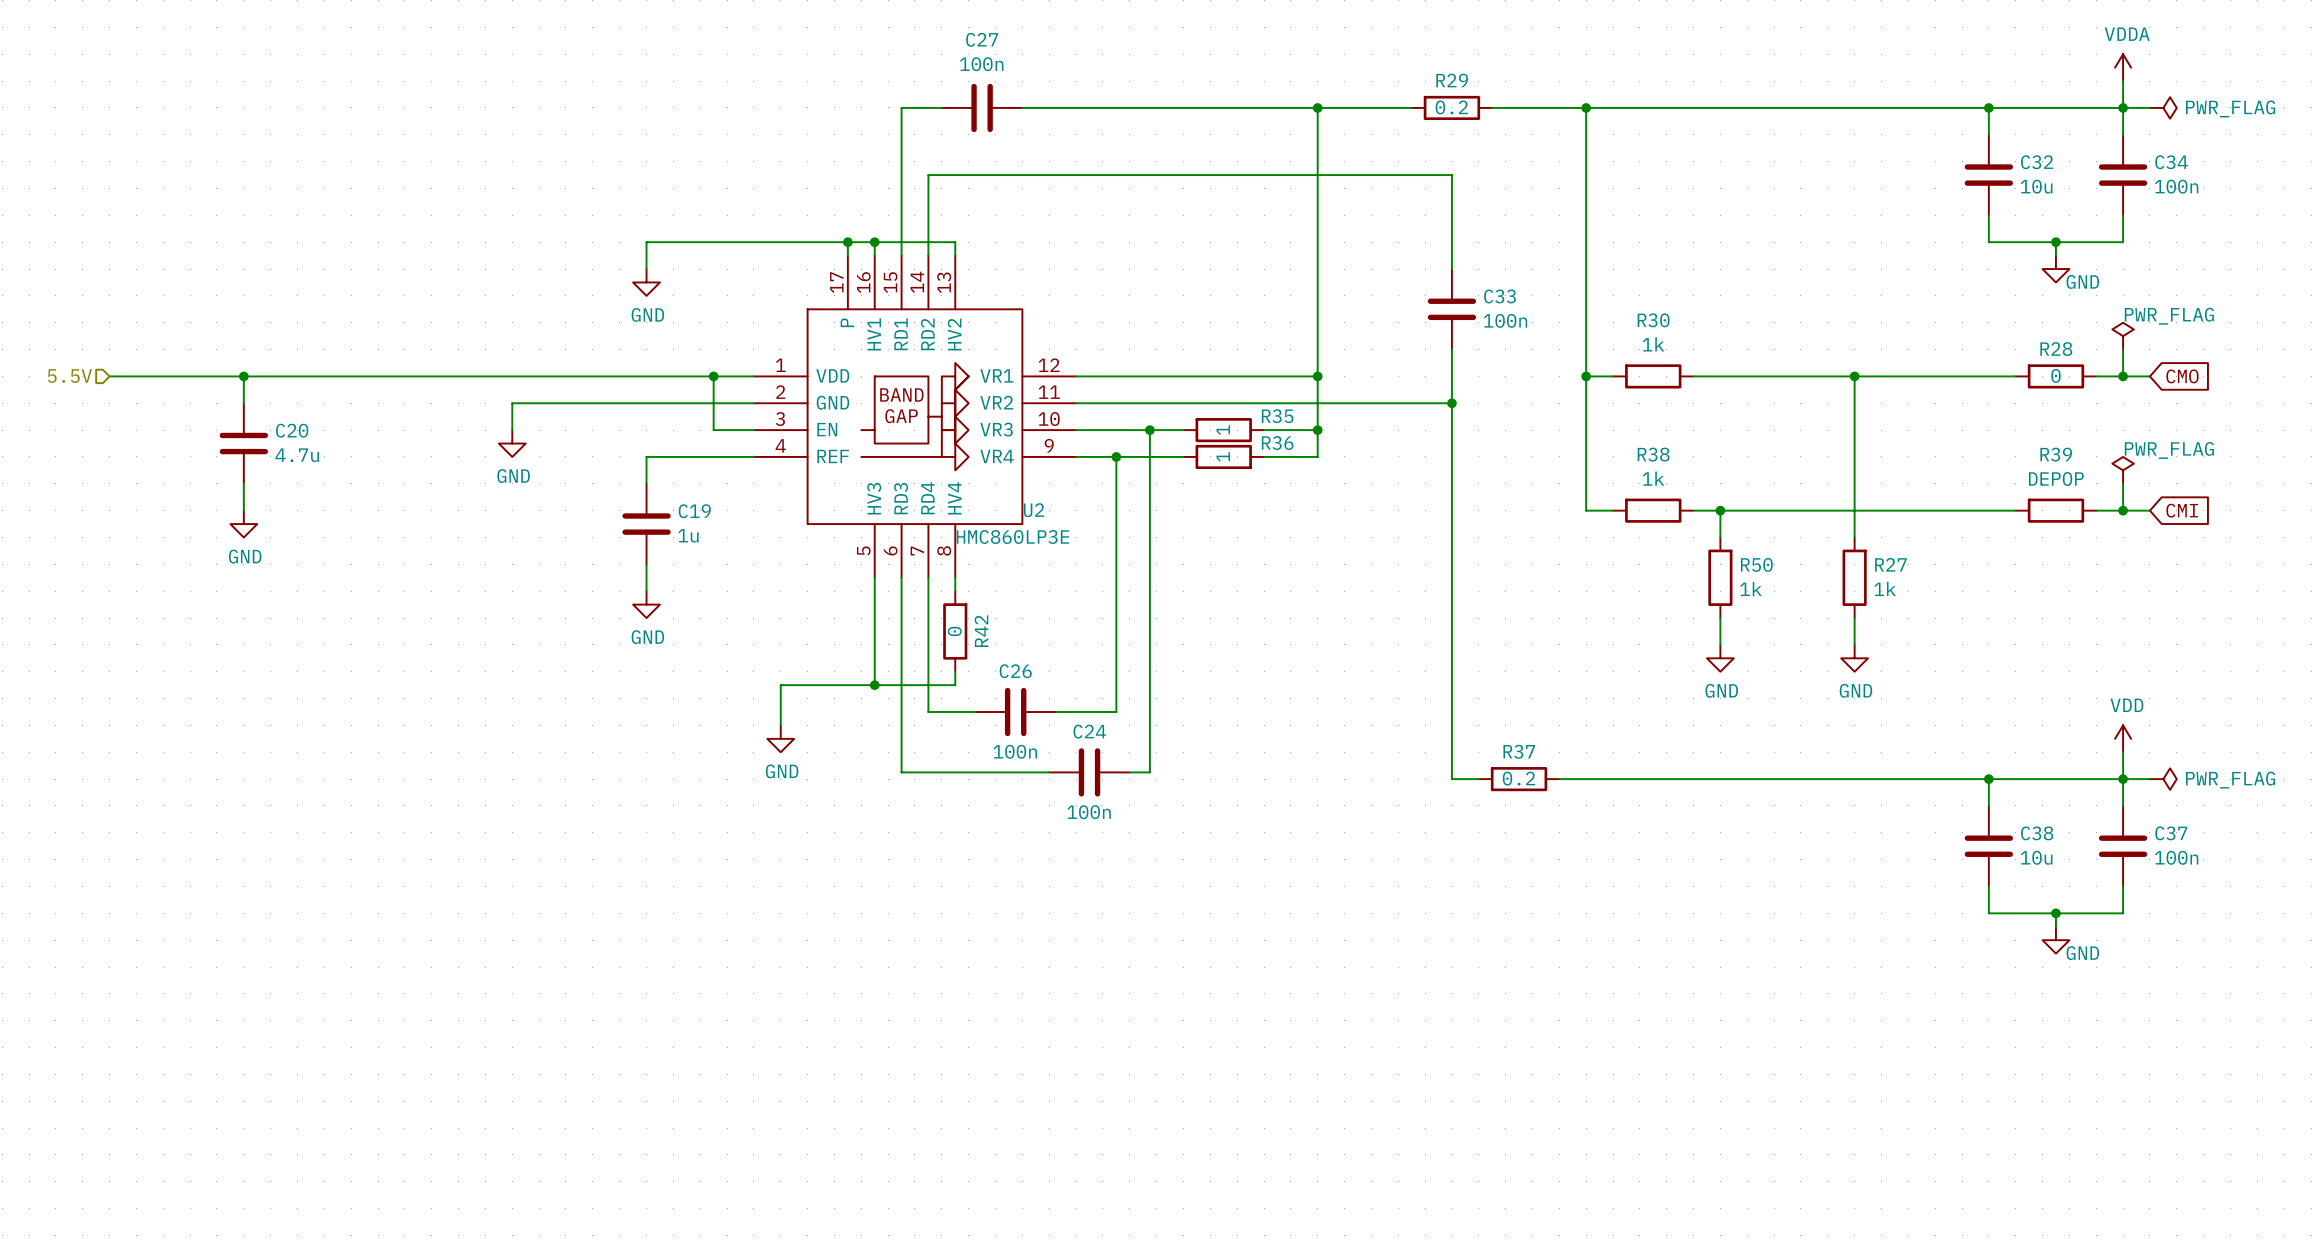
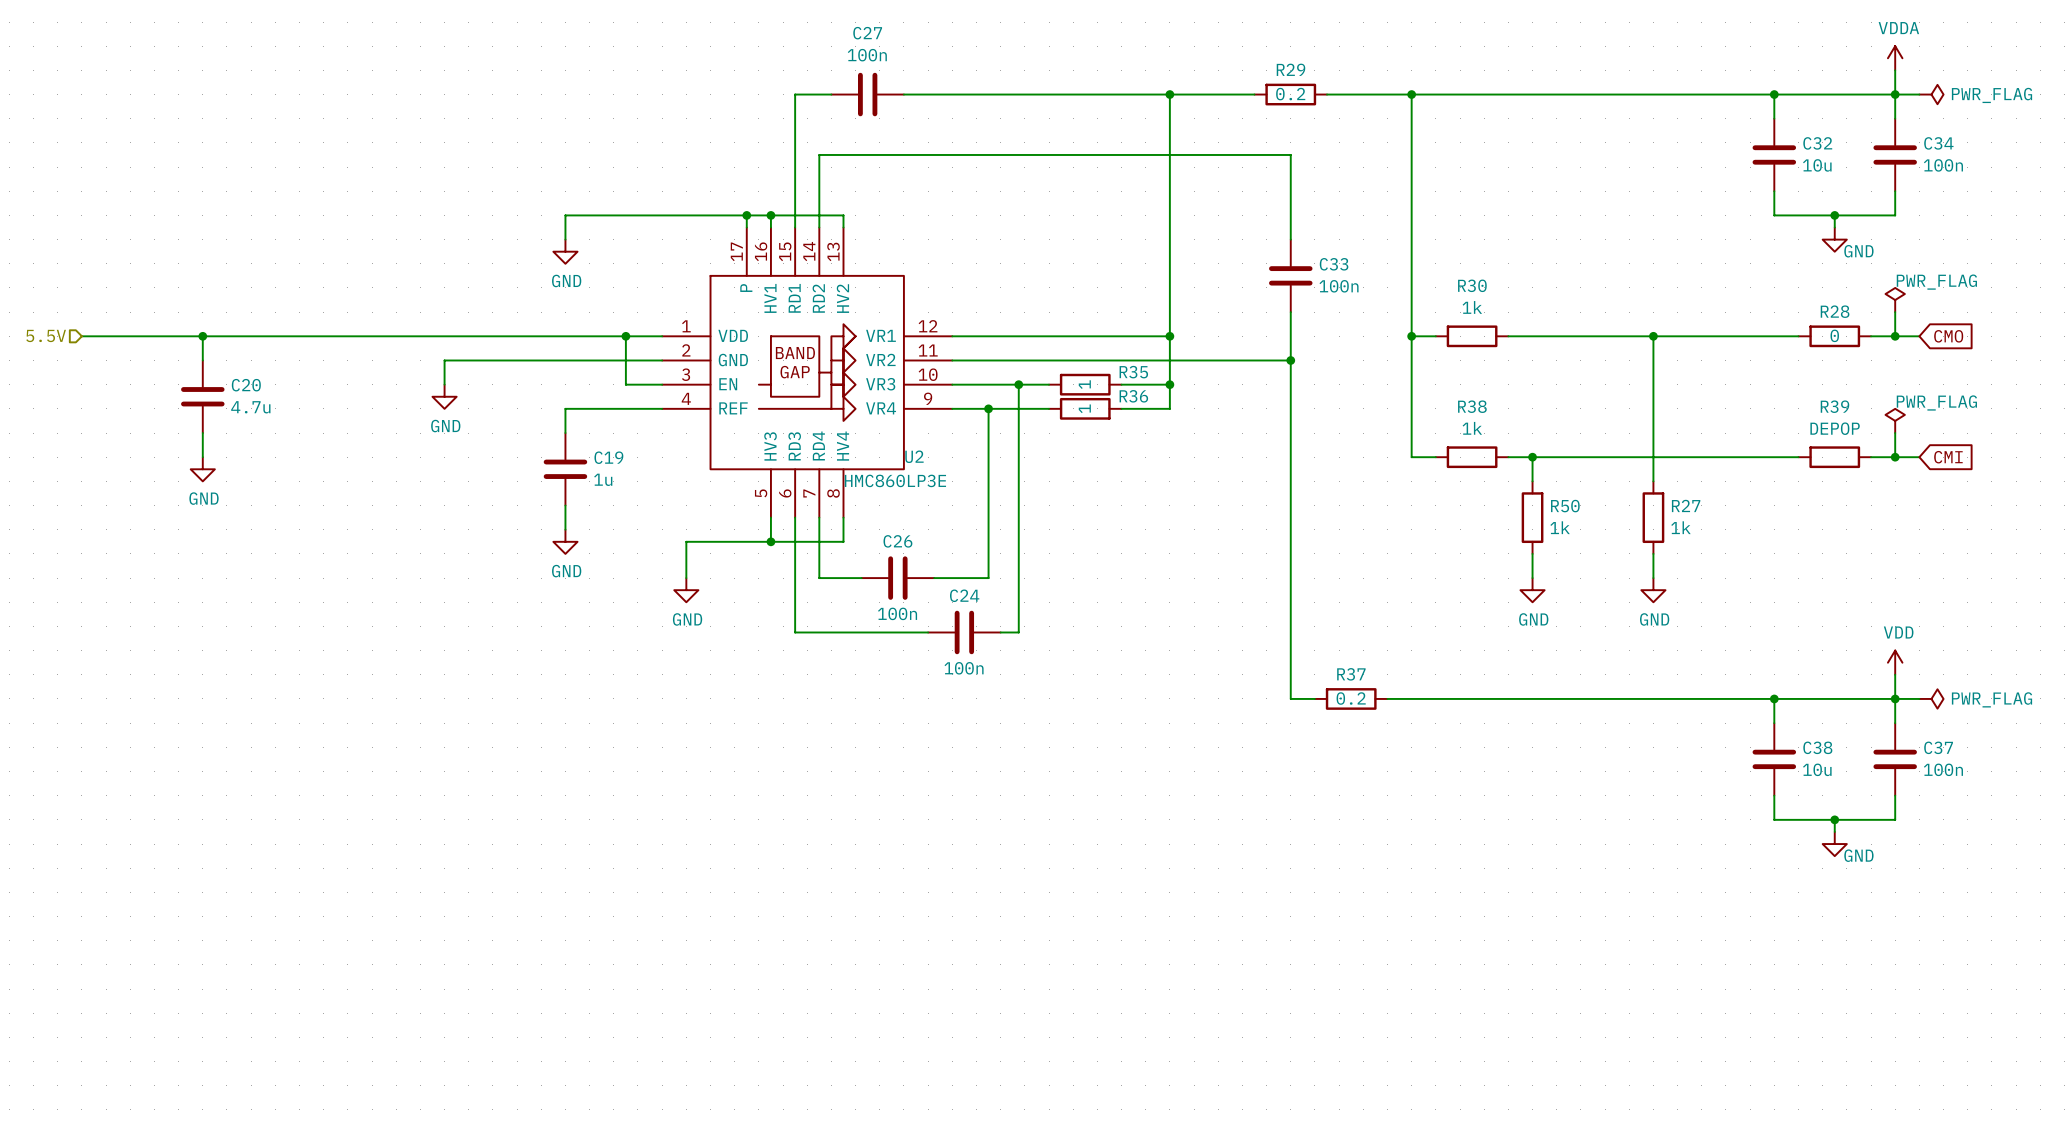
wire: (874, 604) (874, 685) -> none
junction: none -> (770, 541)
R42: 0 (955, 631) -> none
wire: (928, 644) (928, 712) (975, 712) -> (819, 578) (861, 578)
wire: (1116, 644) (1116, 712) (1055, 712) -> (988, 578) (934, 578)
wire: (955, 671) (955, 685) (780, 685) (780, 725) -> (843, 529) (843, 541) (686, 541) (686, 578)
junction: (874, 685) -> none
wire: (901, 705) (901, 772) (1049, 772) -> (795, 632) (928, 632)
wire: (1149, 705) (1149, 772) (1129, 772) -> (1018, 632) (1000, 632)
C26 position: (1015, 712) -> (897, 578)
power symbol position: GND (780, 738) -> GND (686, 590)
C24 position: (1089, 772) -> (964, 632)

